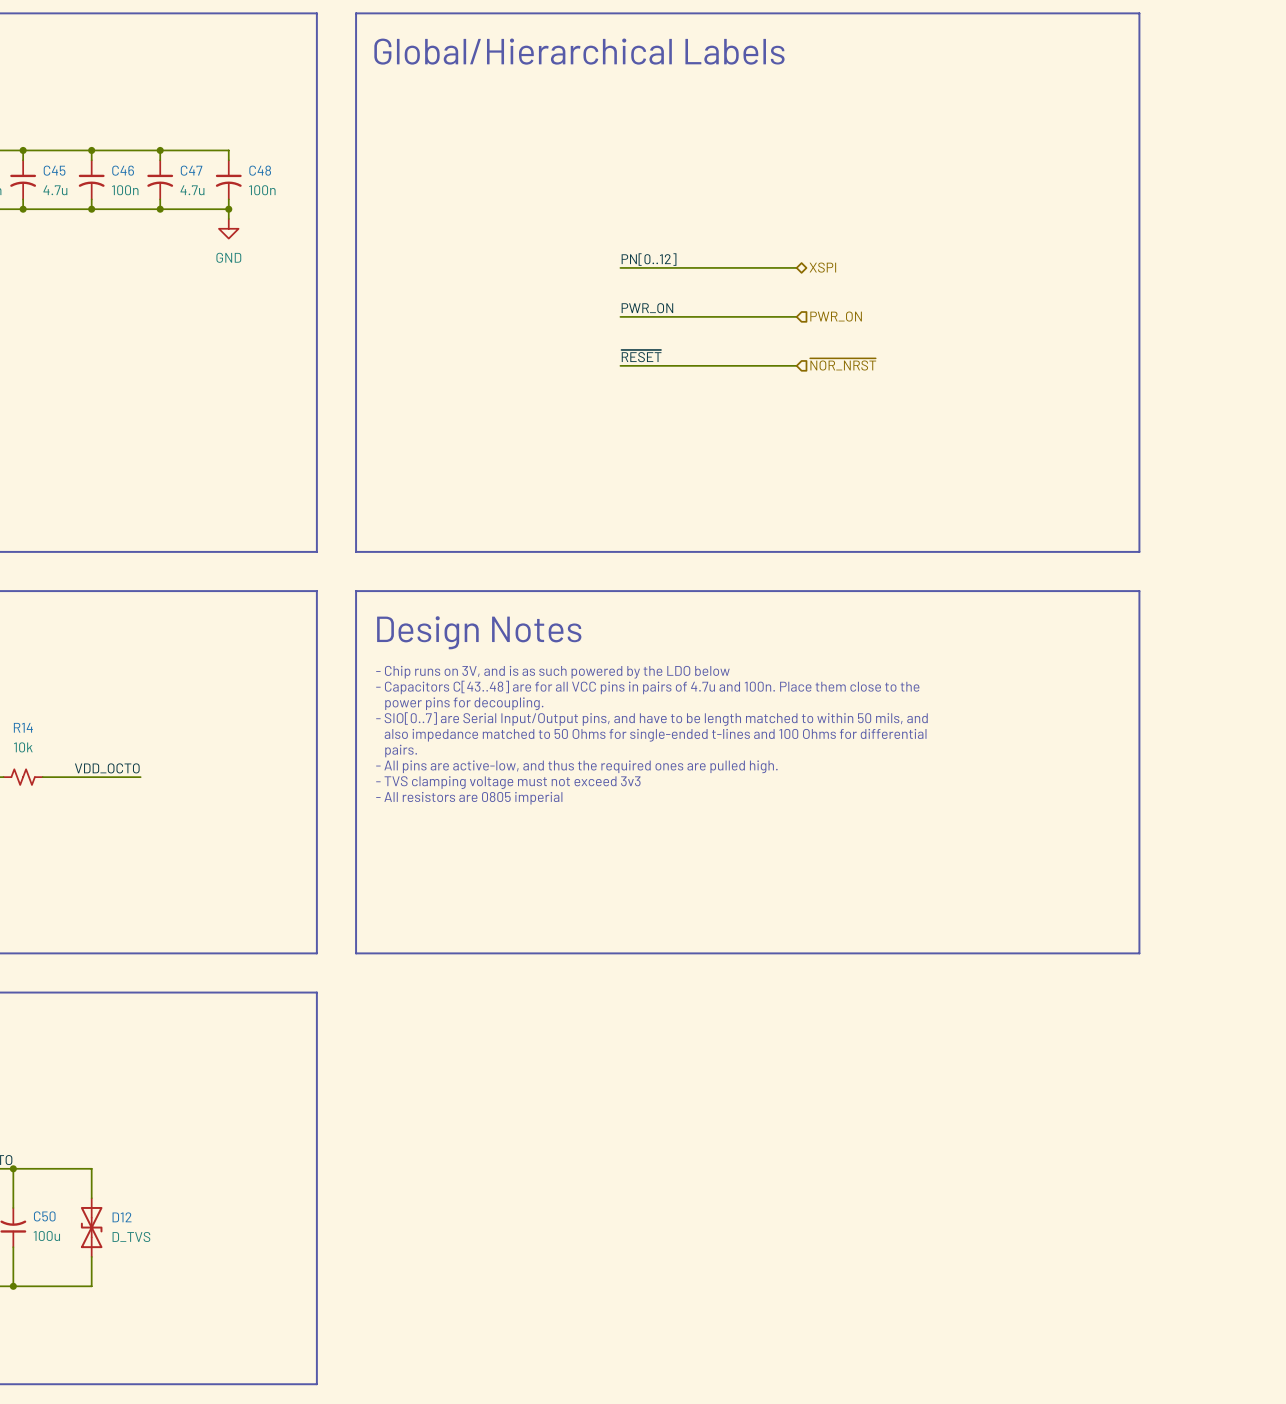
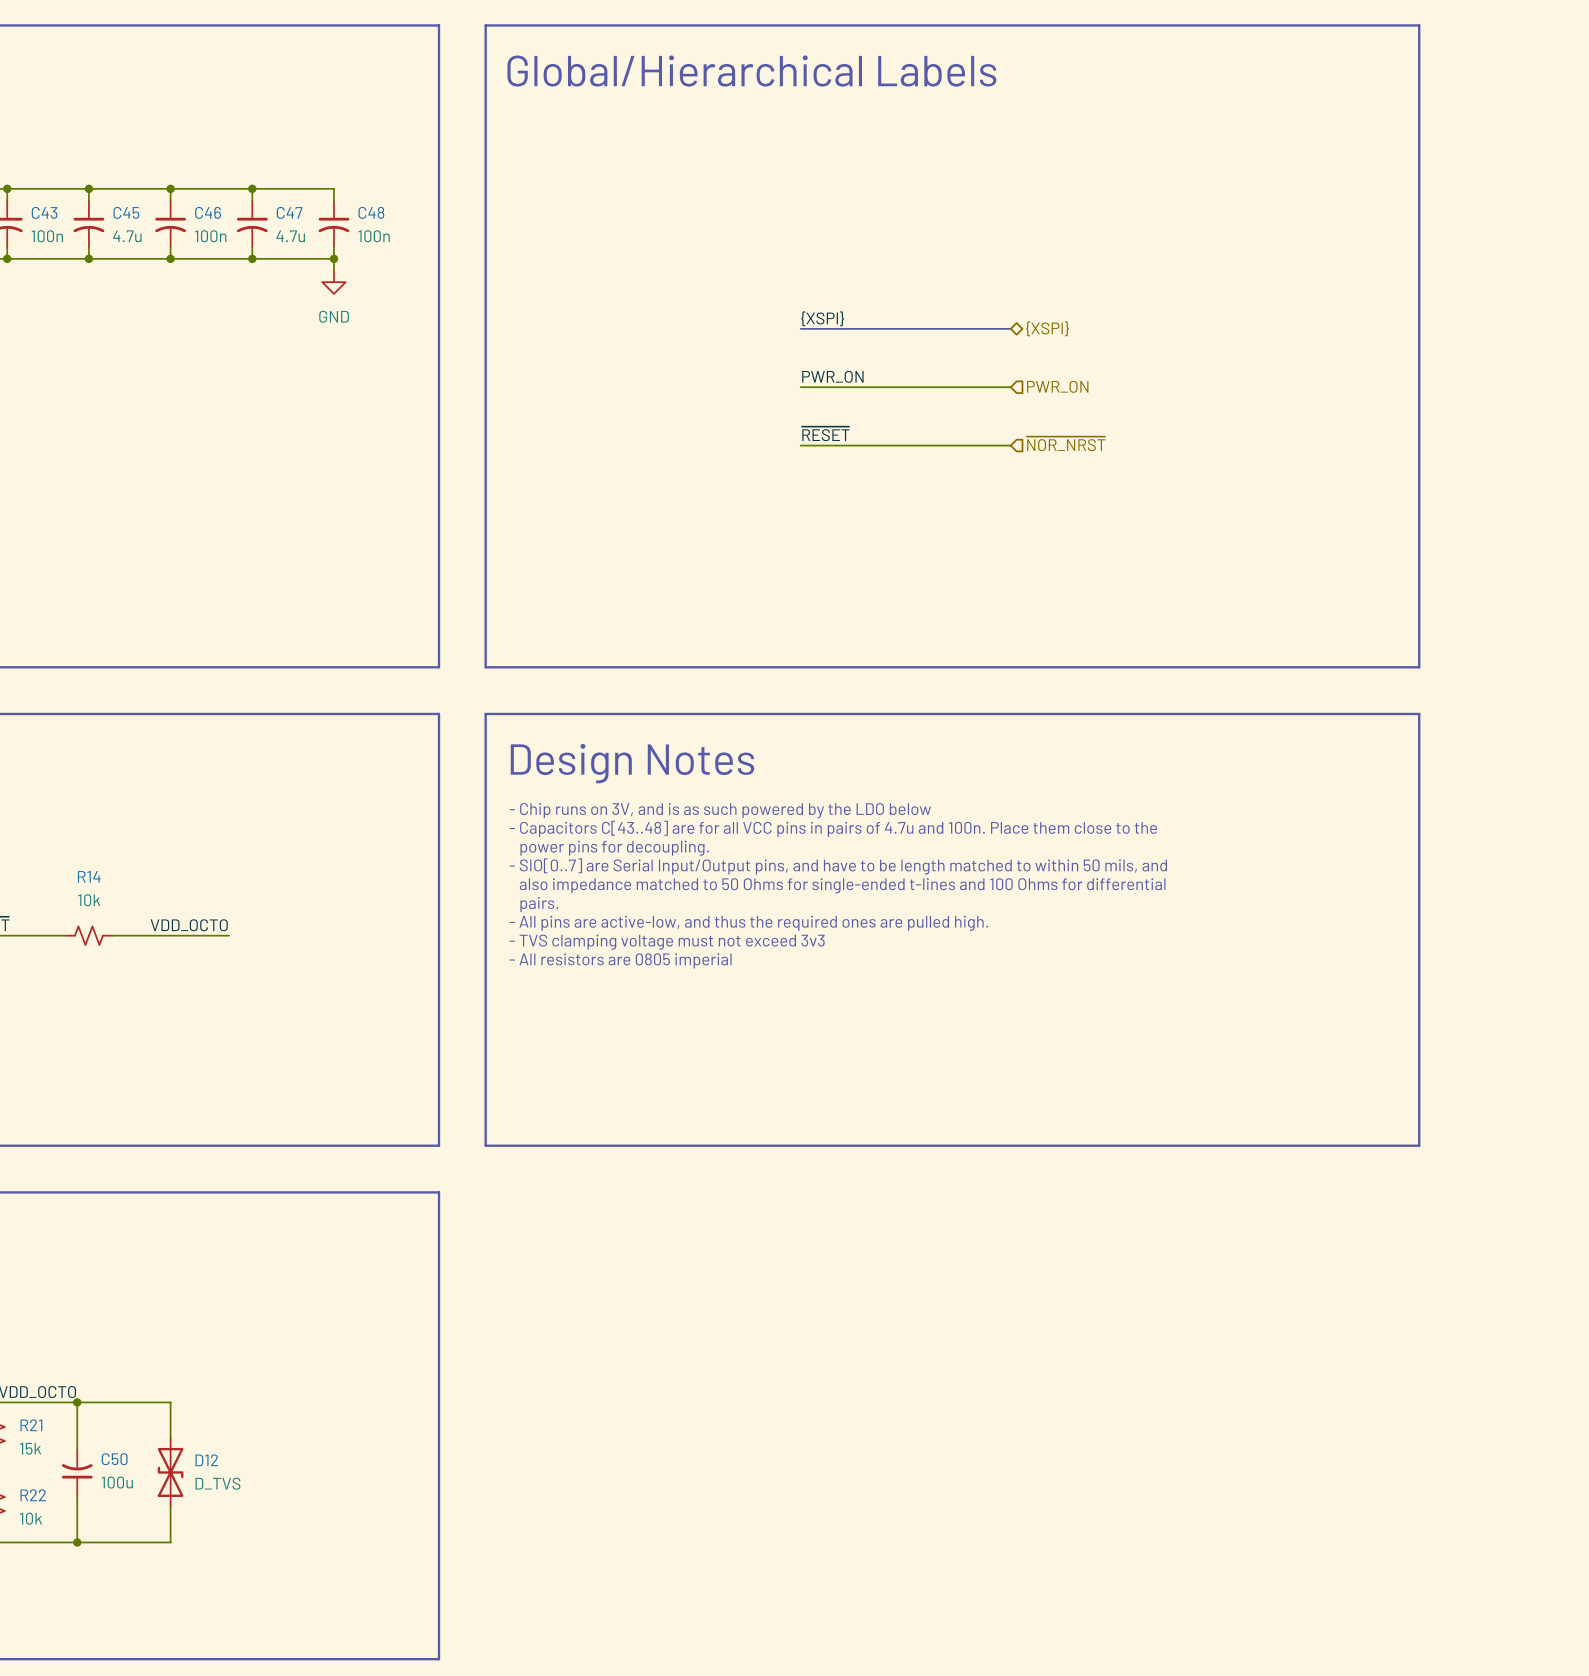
label: PN[0..12] (649, 259) -> {XSPI} (822, 318)
bus: none -> (800, 328) (1010, 328)
hierarchical label: XSPI (822, 267) -> {XSPI} (1047, 328)

